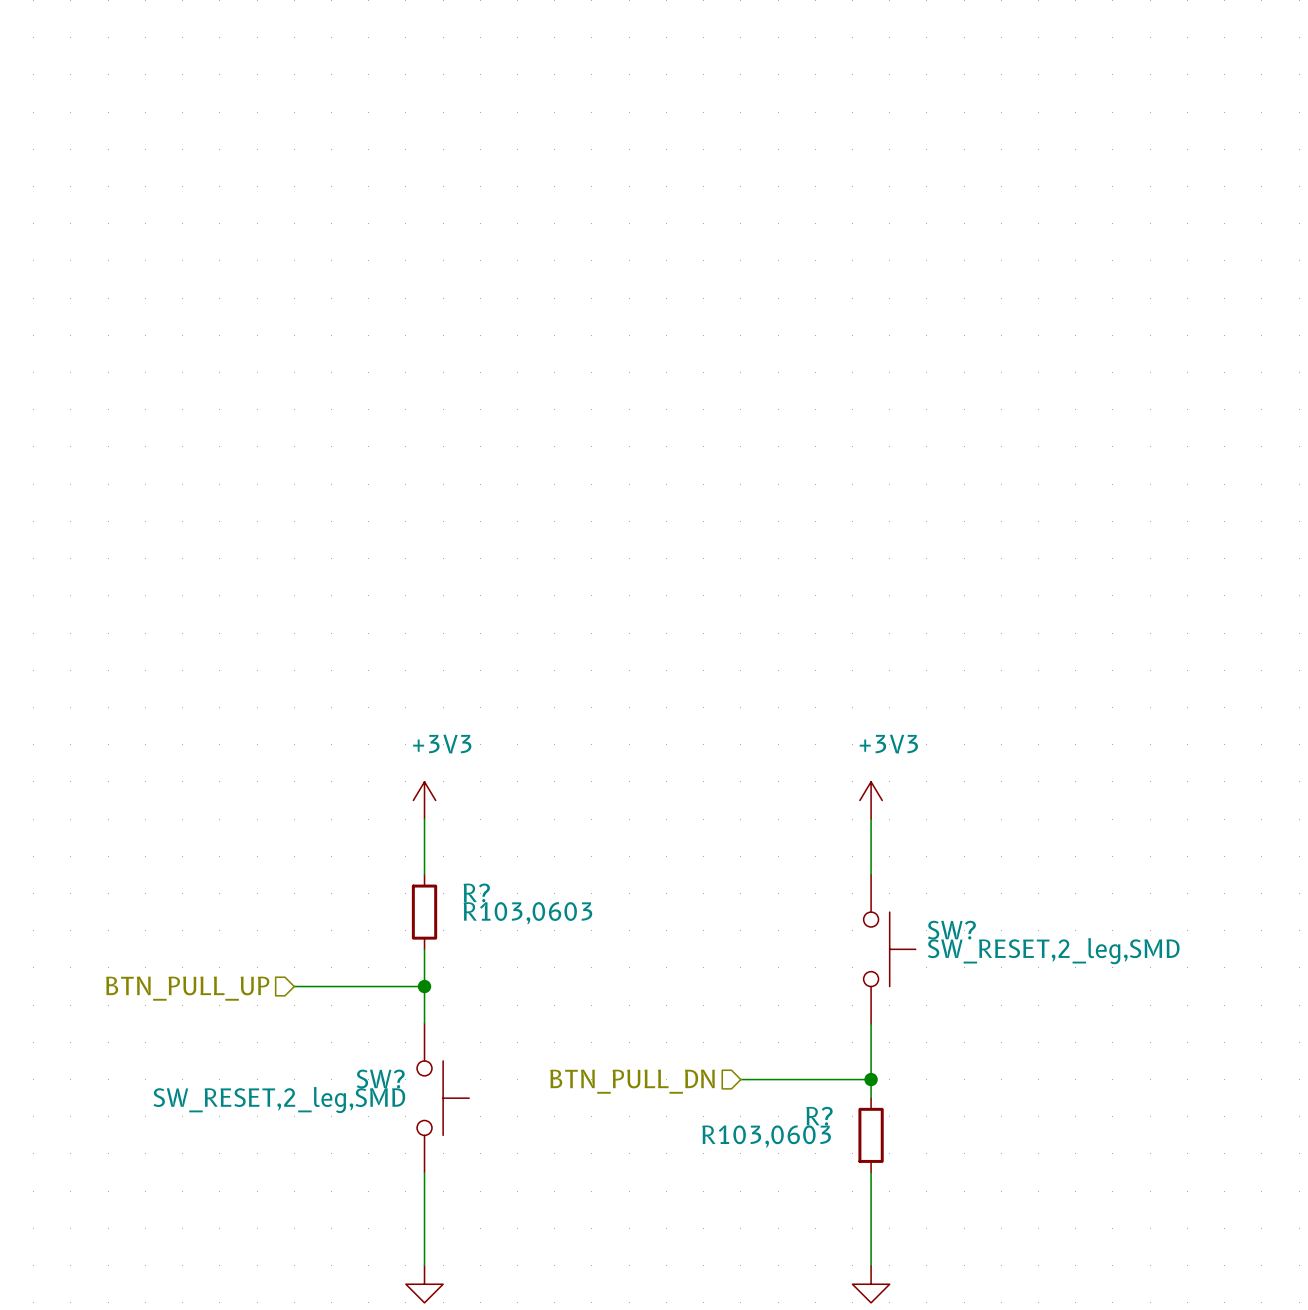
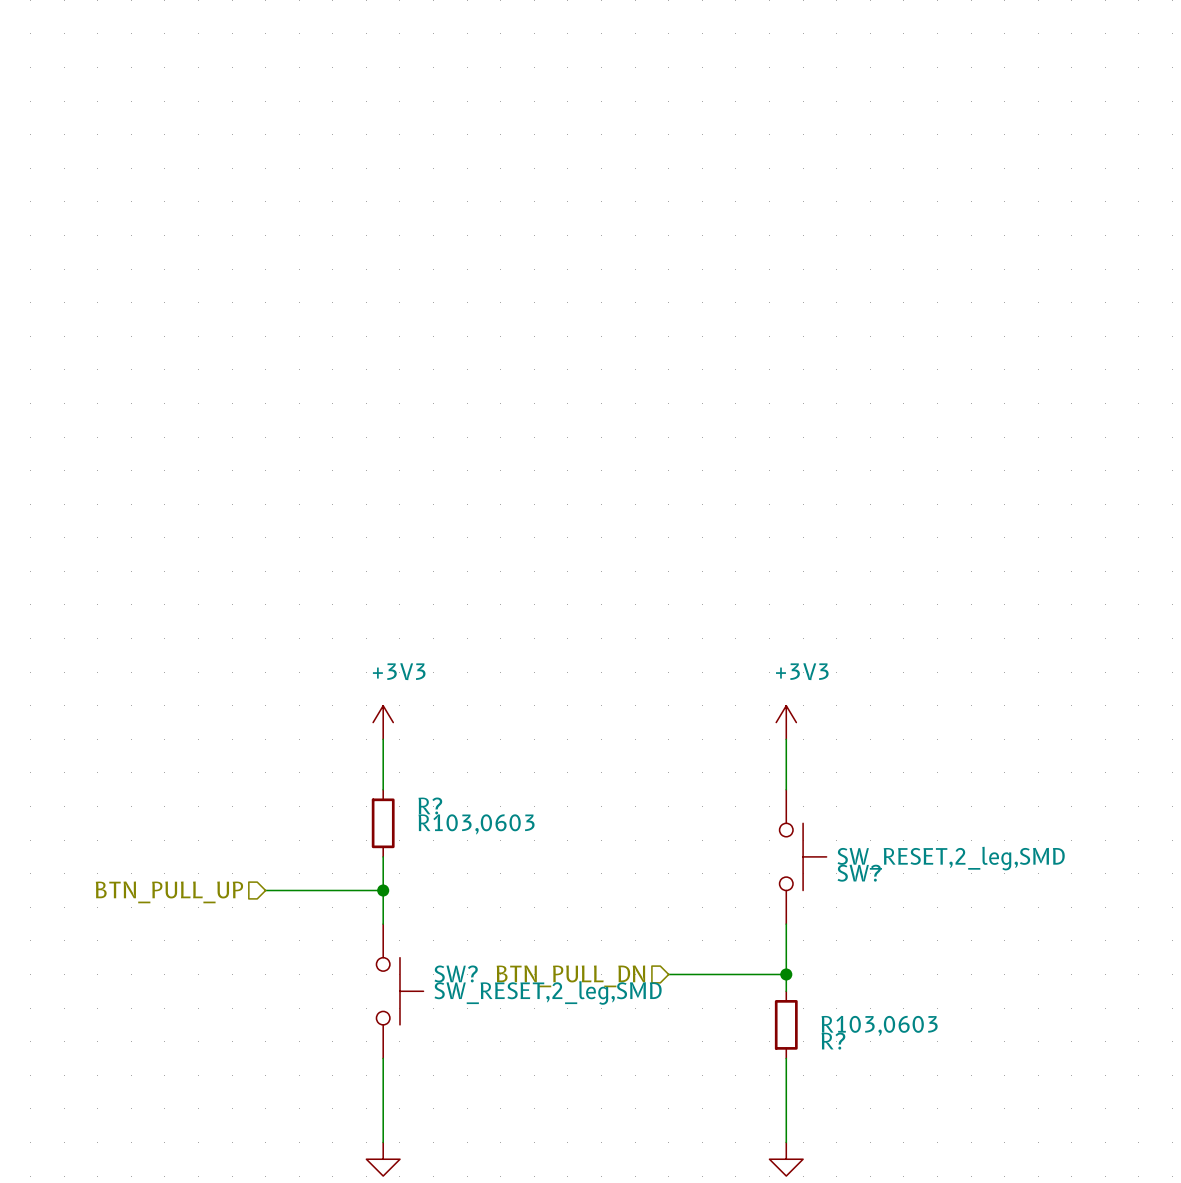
SW? name position: SW? (951, 930) -> SW? (859, 873)
SW? name position: SW? (380, 1078) -> SW? (456, 973)
SW? value position: SW_RESET,2_leg,SMD (279, 1100) -> SW_RESET,2_leg,SMD (548, 992)
R? name position: R? (819, 1116) -> R? (833, 1041)
R? value position: R103,0603 (766, 1136) -> R103,0603 (879, 1025)

